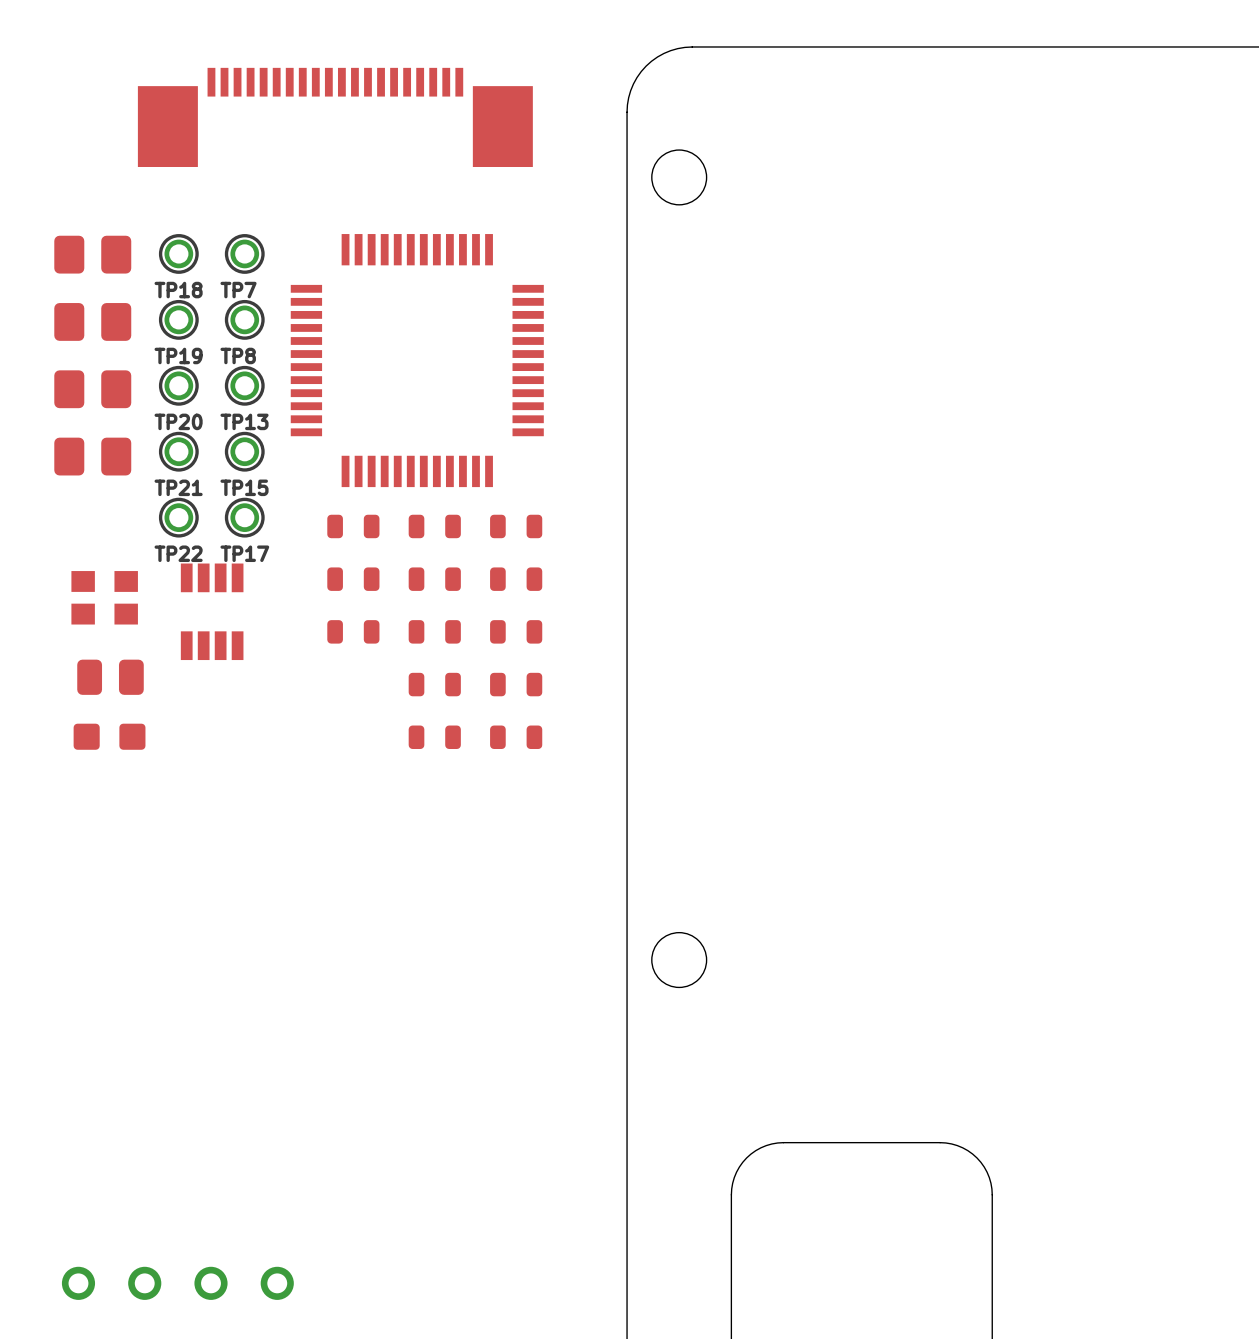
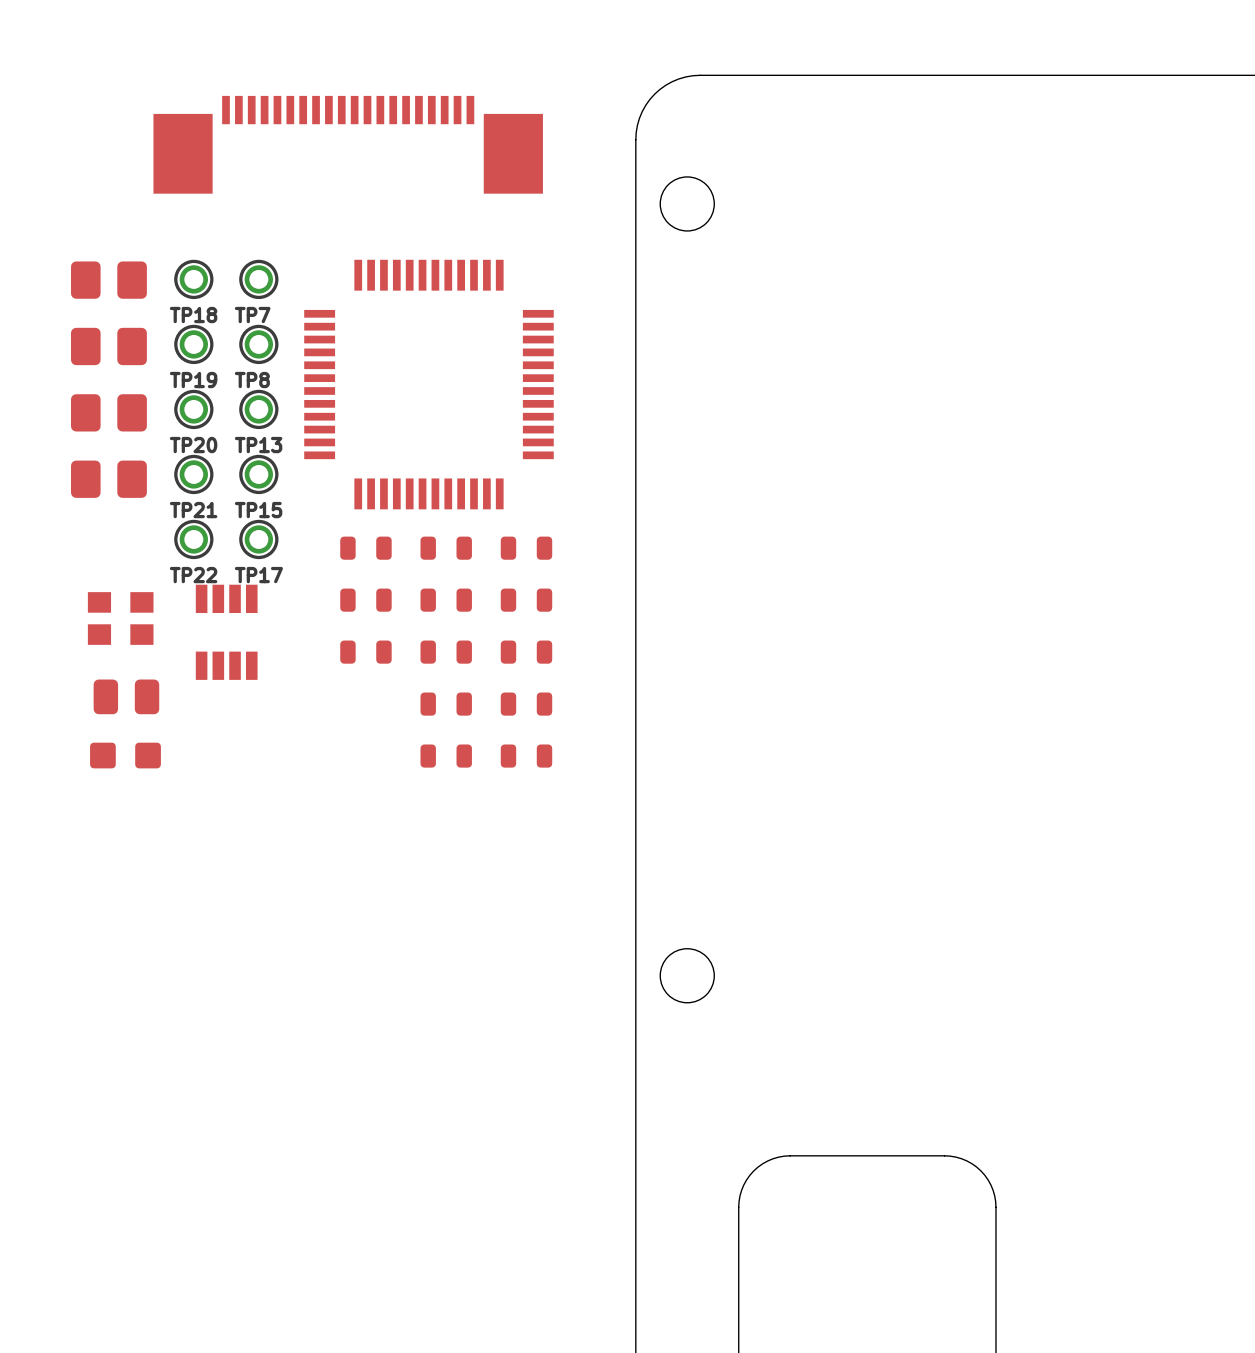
part: (177, 1283) -> none

